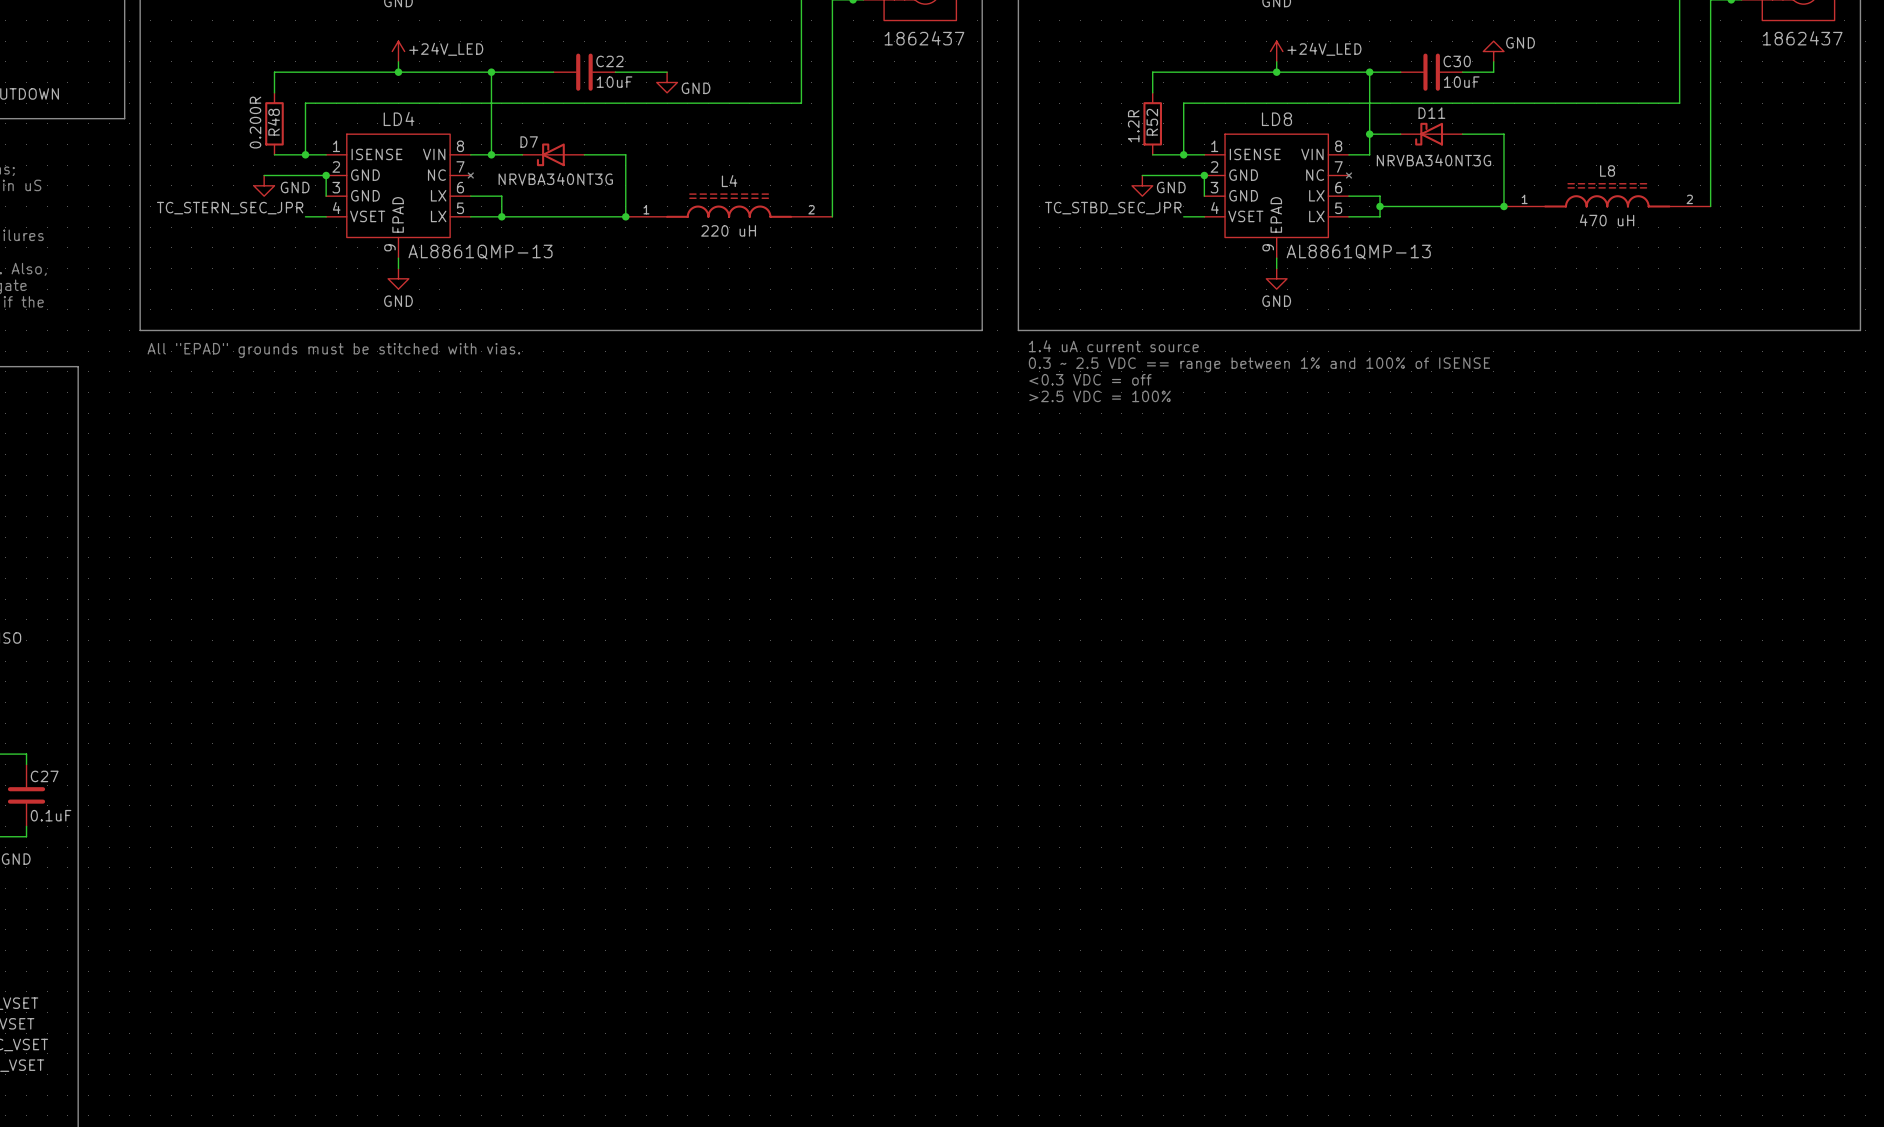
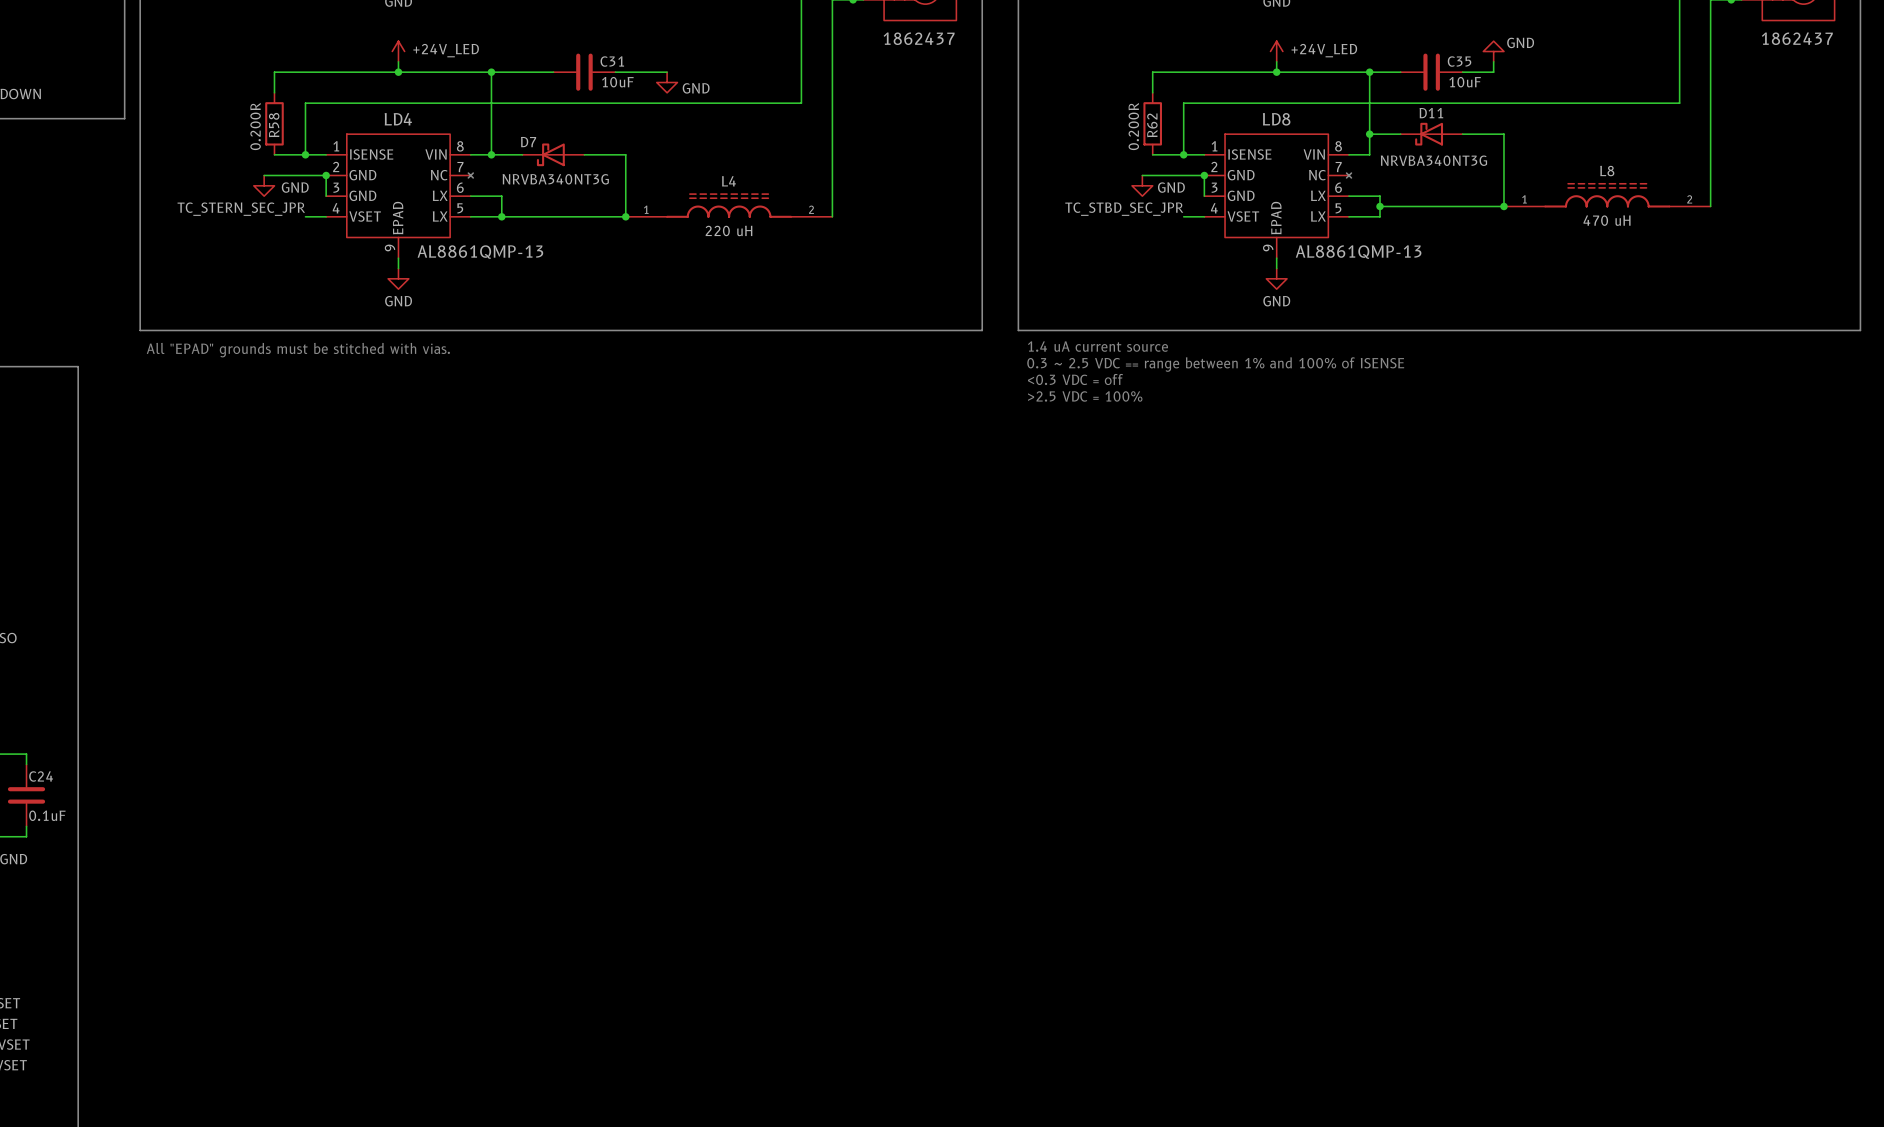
C22 name: C22 (609, 61) -> C31 (612, 61)
C30 name: C30 (1457, 61) -> C35 (1459, 61)
R48 name: R48 (273, 122) -> R58 (274, 125)
R52 name: R52 (1152, 122) -> R62 (1152, 125)
R52 value: 1.2R (1133, 126) -> 0.200R (1133, 126)
C27 name: C27 (44, 776) -> C24 (41, 776)

